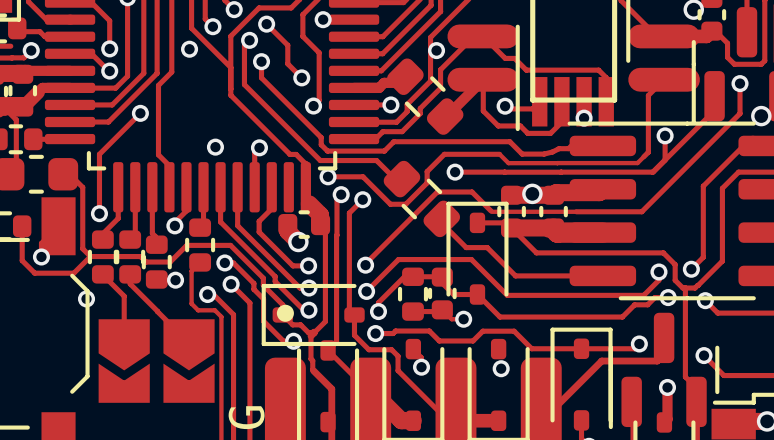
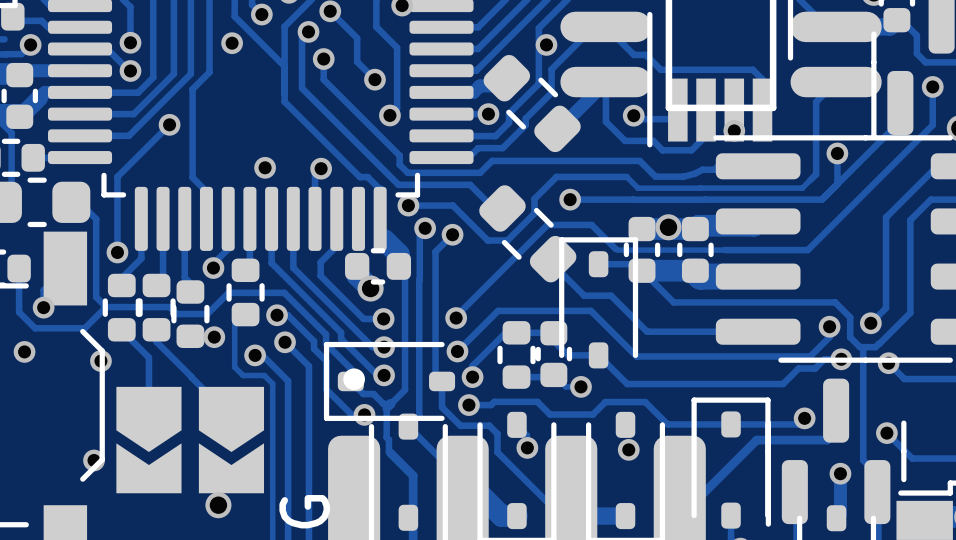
via: none -> (24, 351)
via: none -> (94, 460)
via: none -> (218, 505)

